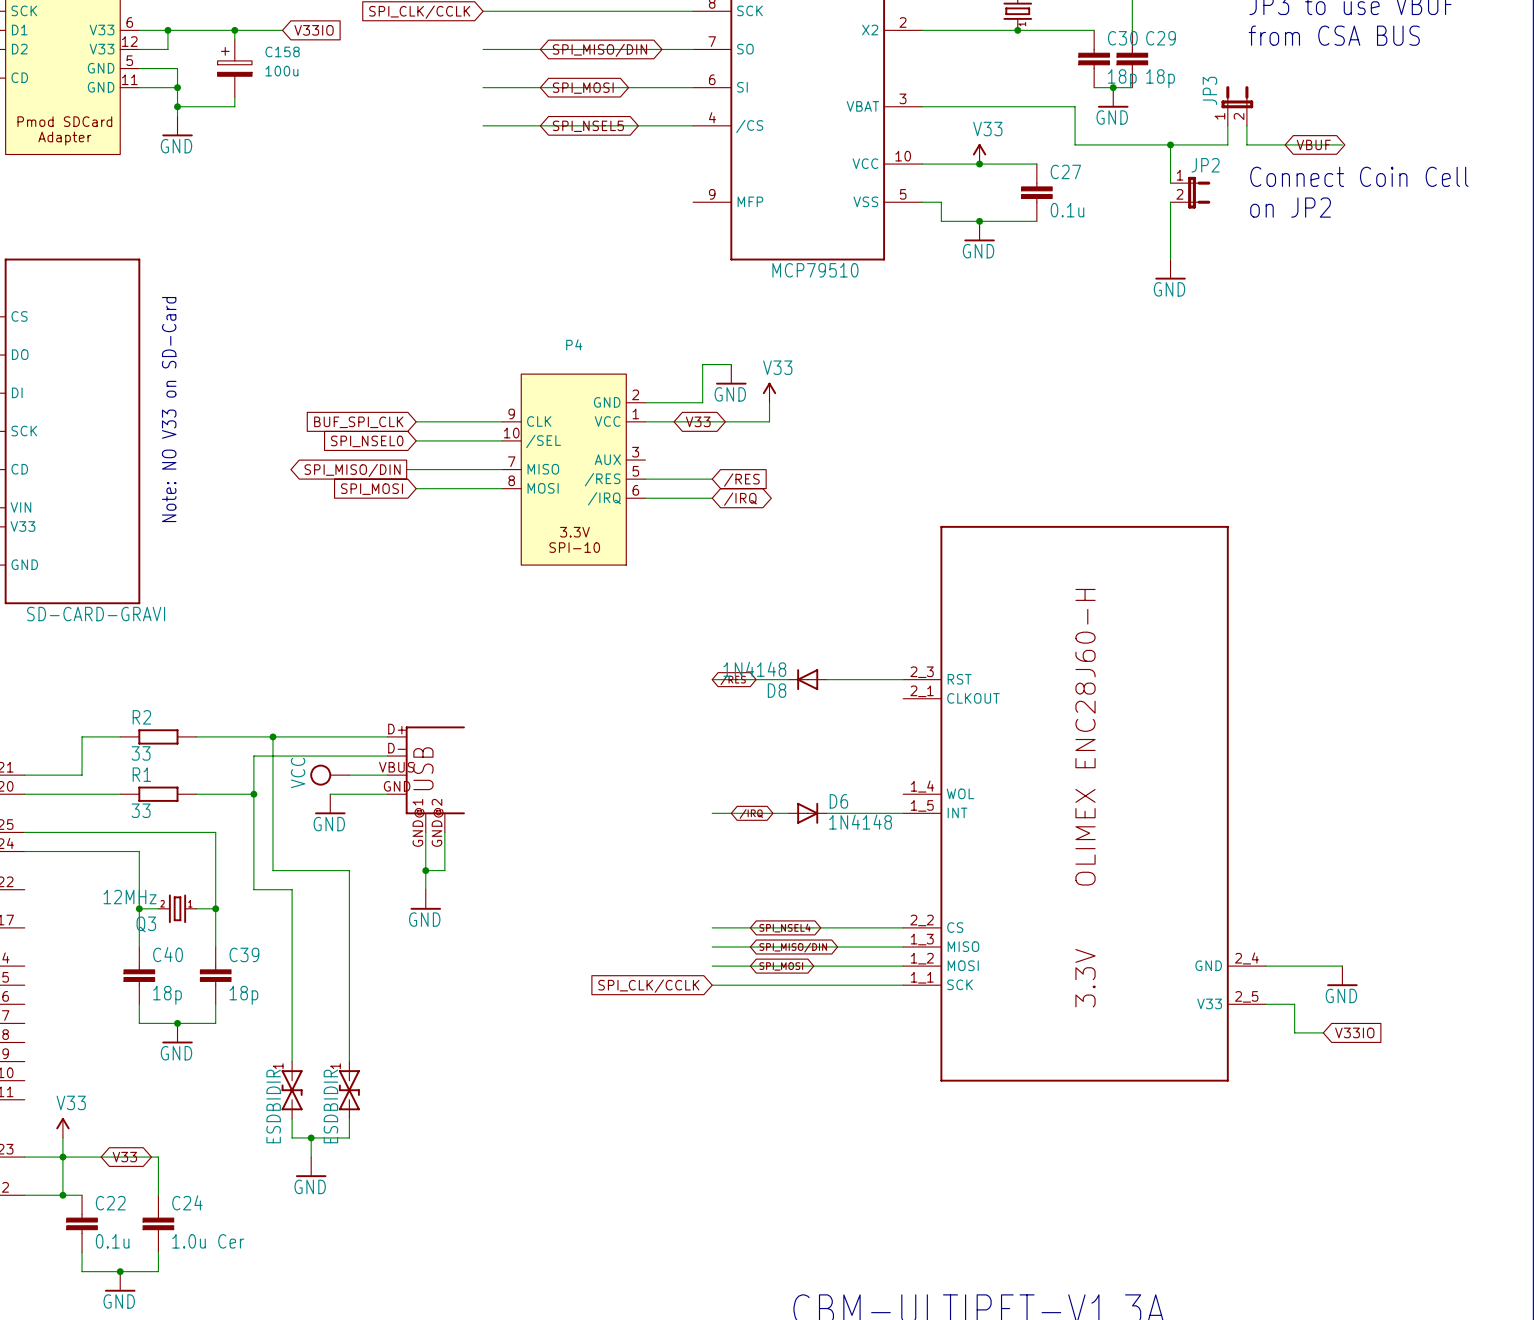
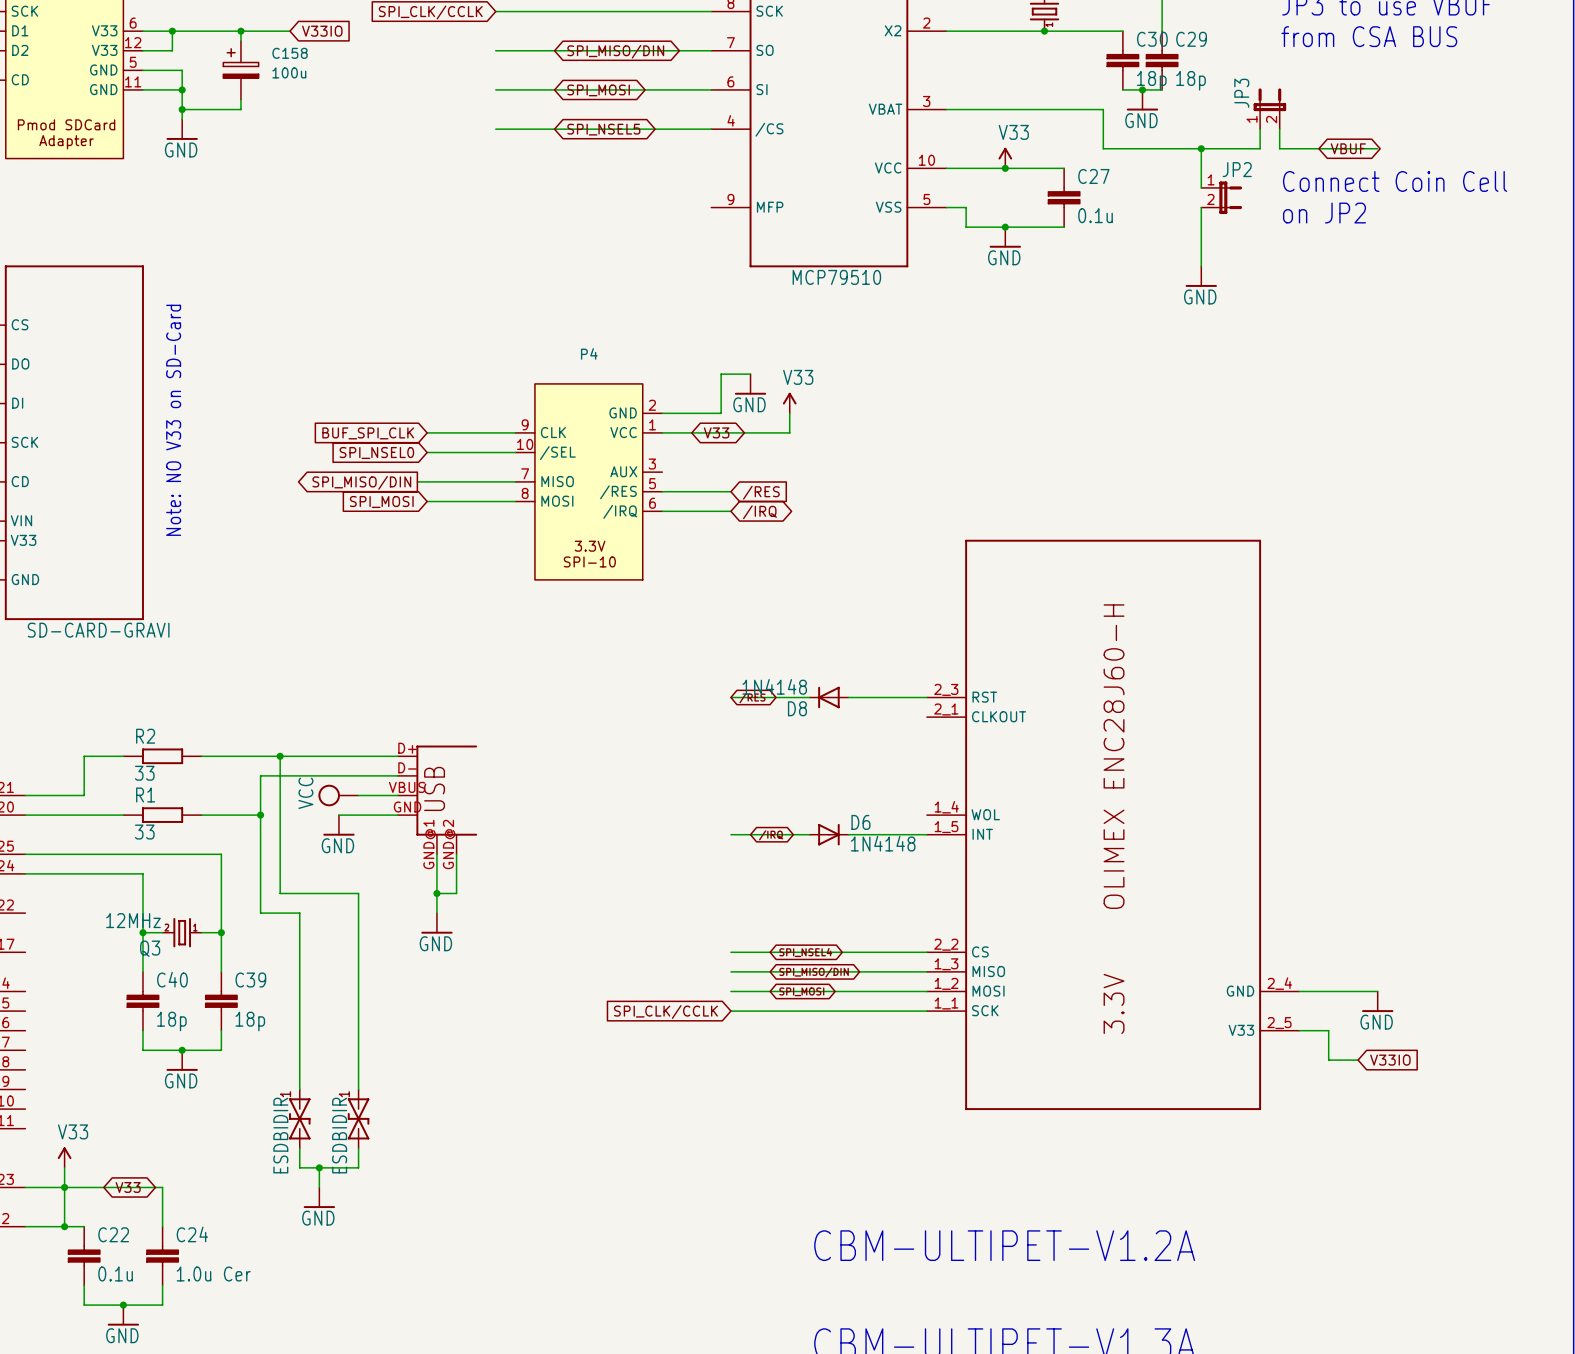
text: none -> CBM-ULTIPET-V1.2A (1004, 1245)

